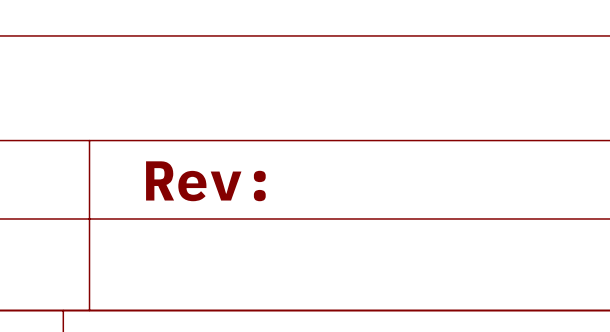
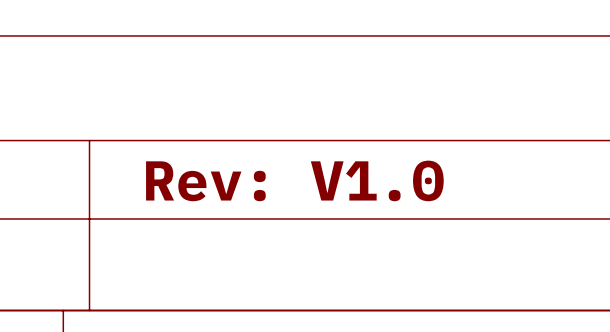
title block: Rev: (205, 181) -> Rev: V1.0 (294, 180)

